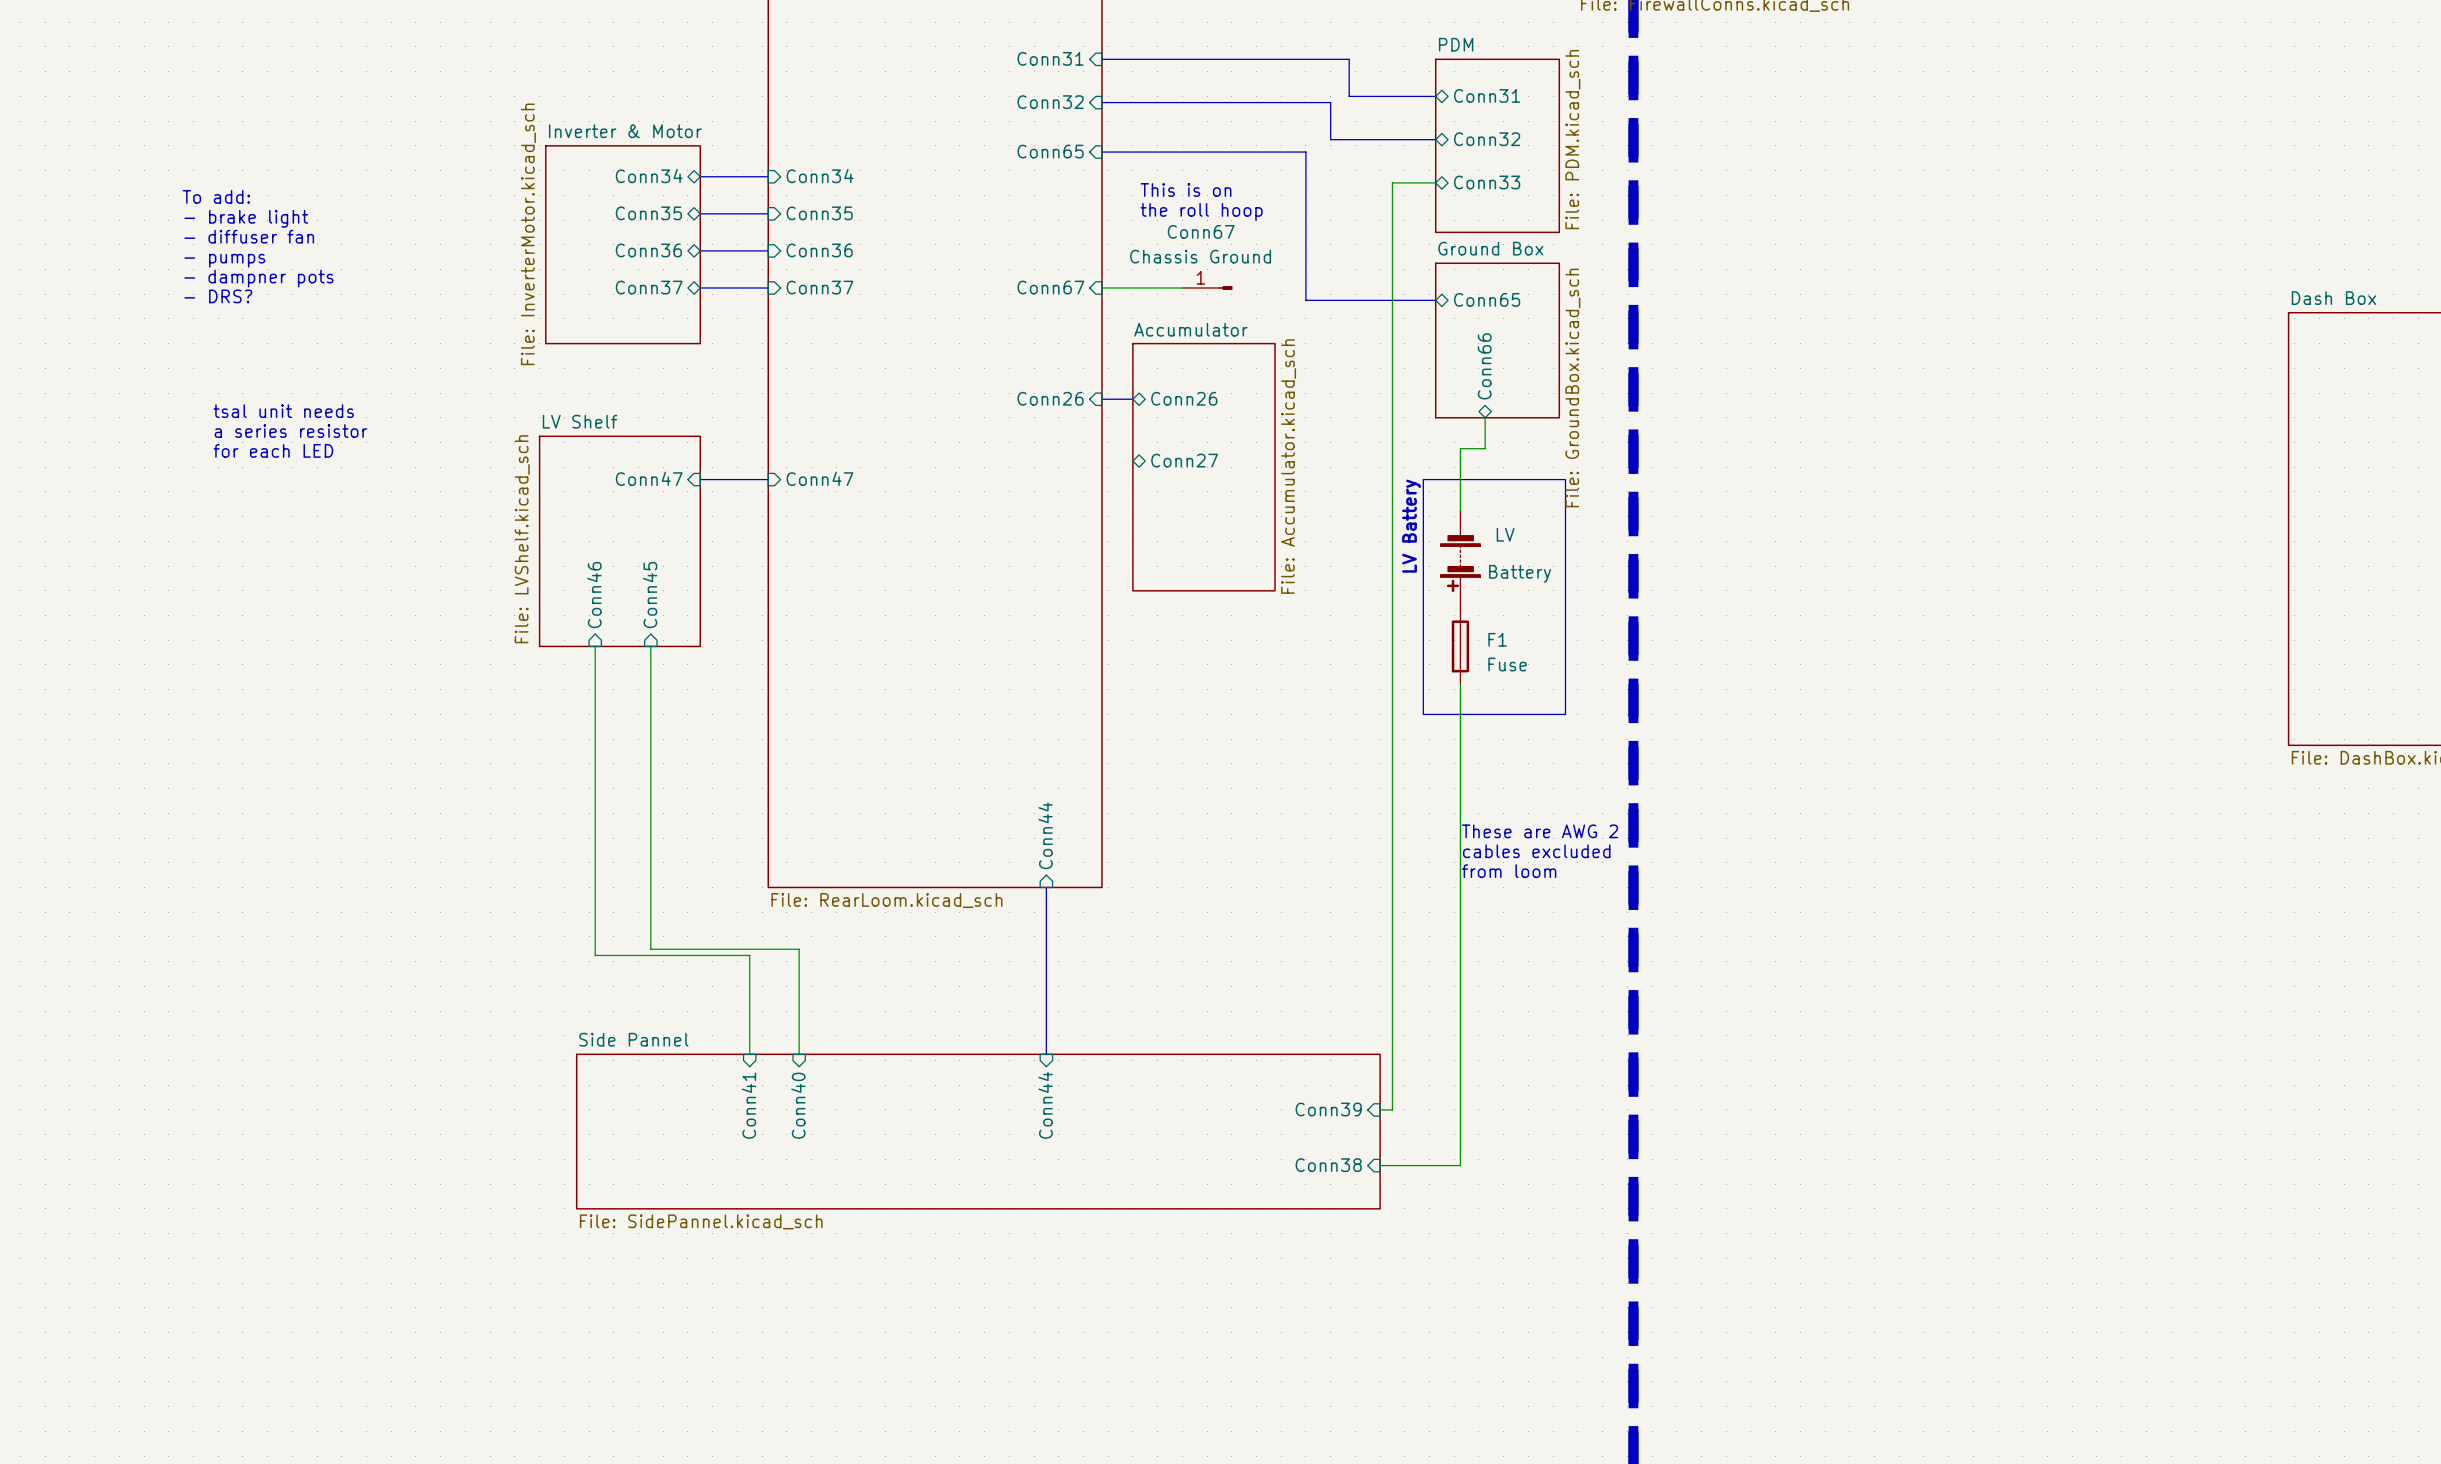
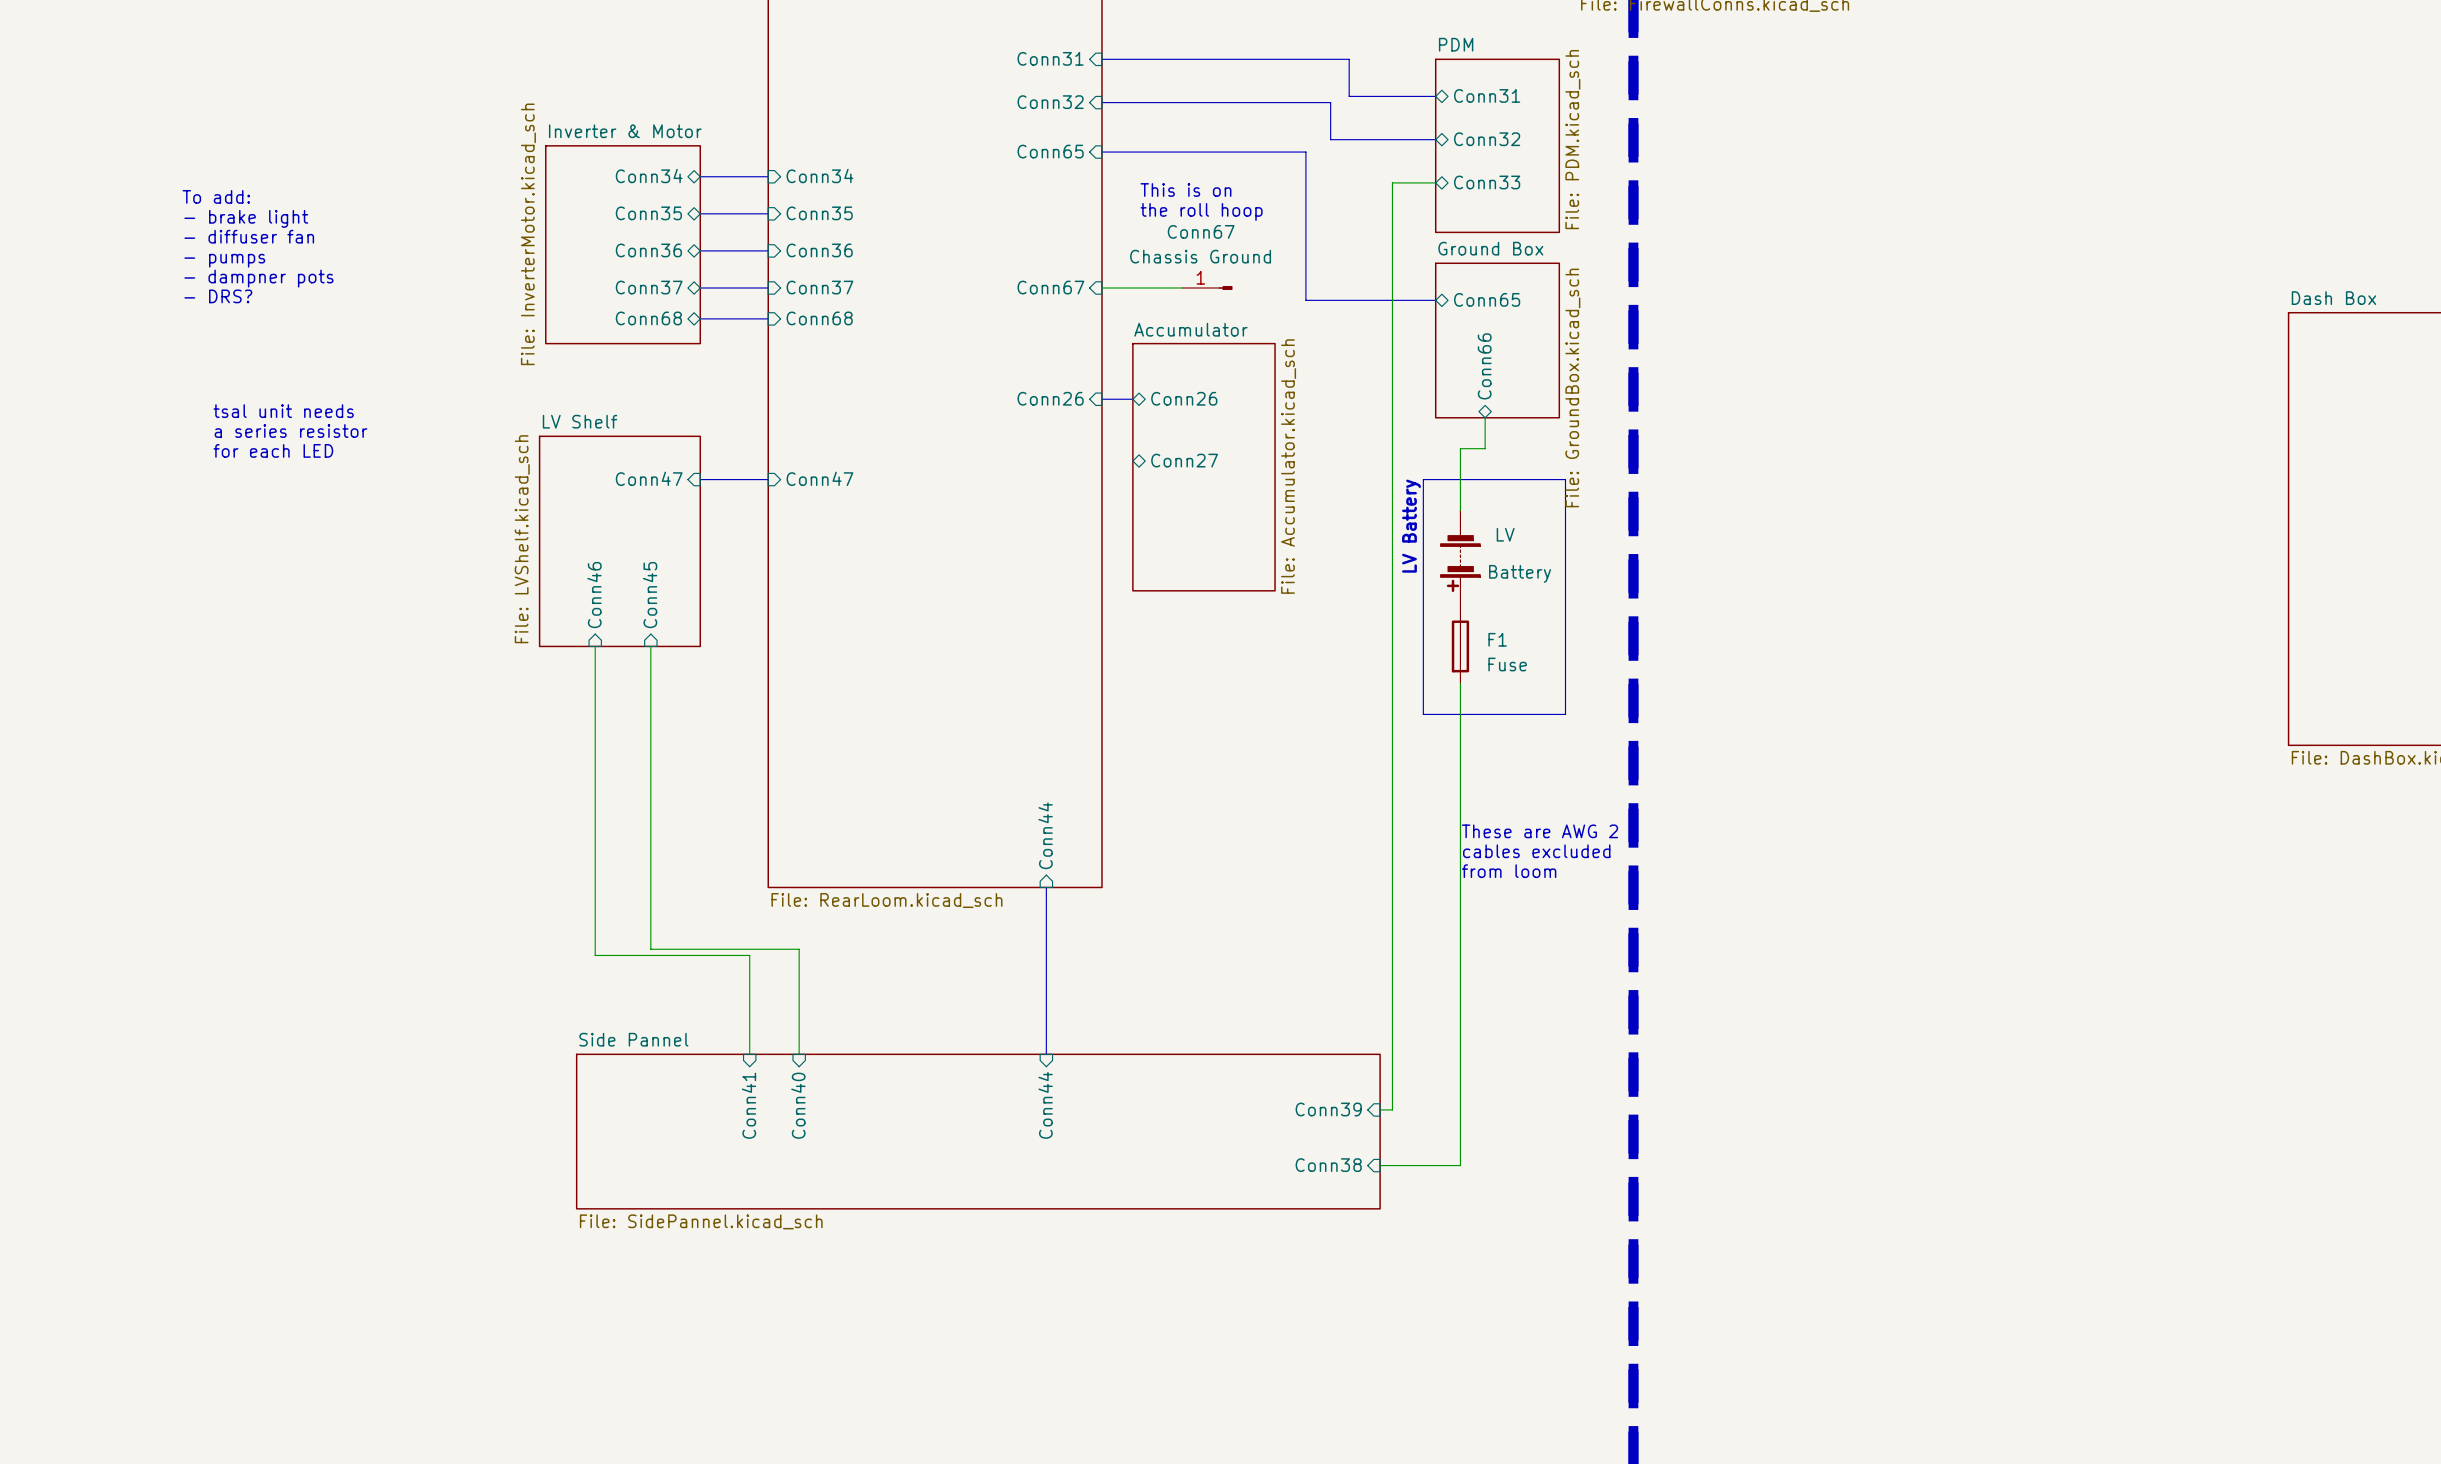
sheet pin: none -> Conn68 (648, 318)
bus: none -> (700, 318) (768, 318)
sheet pin: none -> Conn68 (819, 318)

